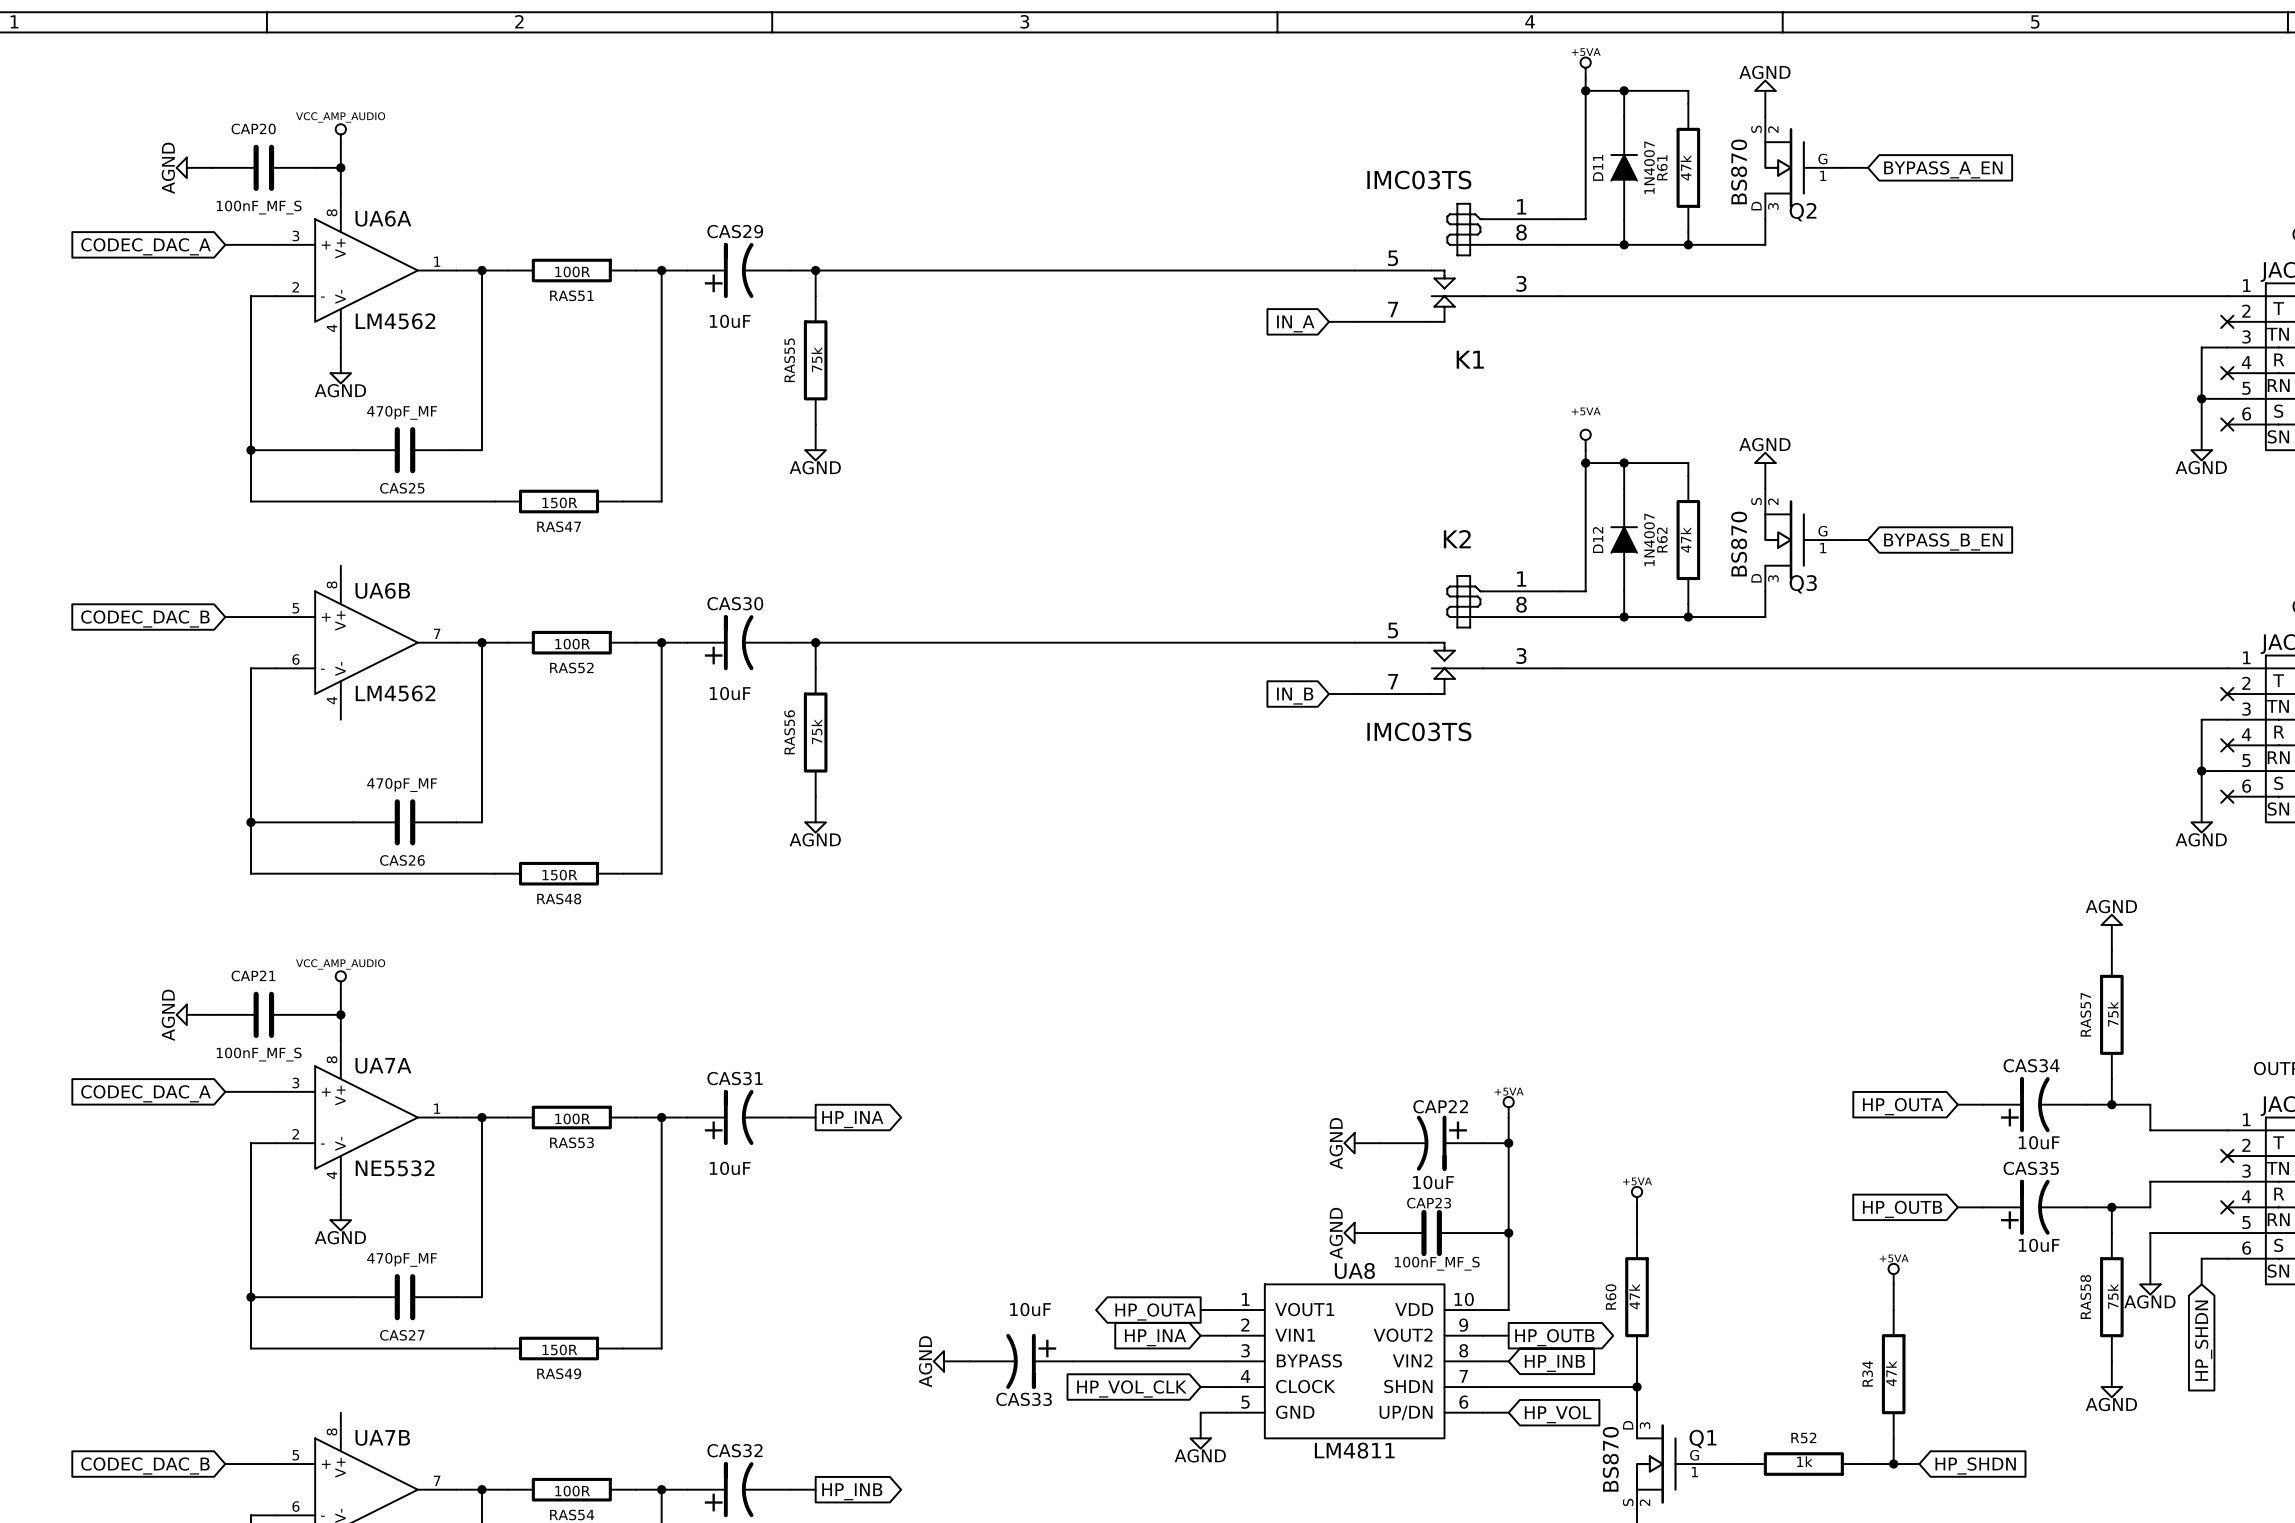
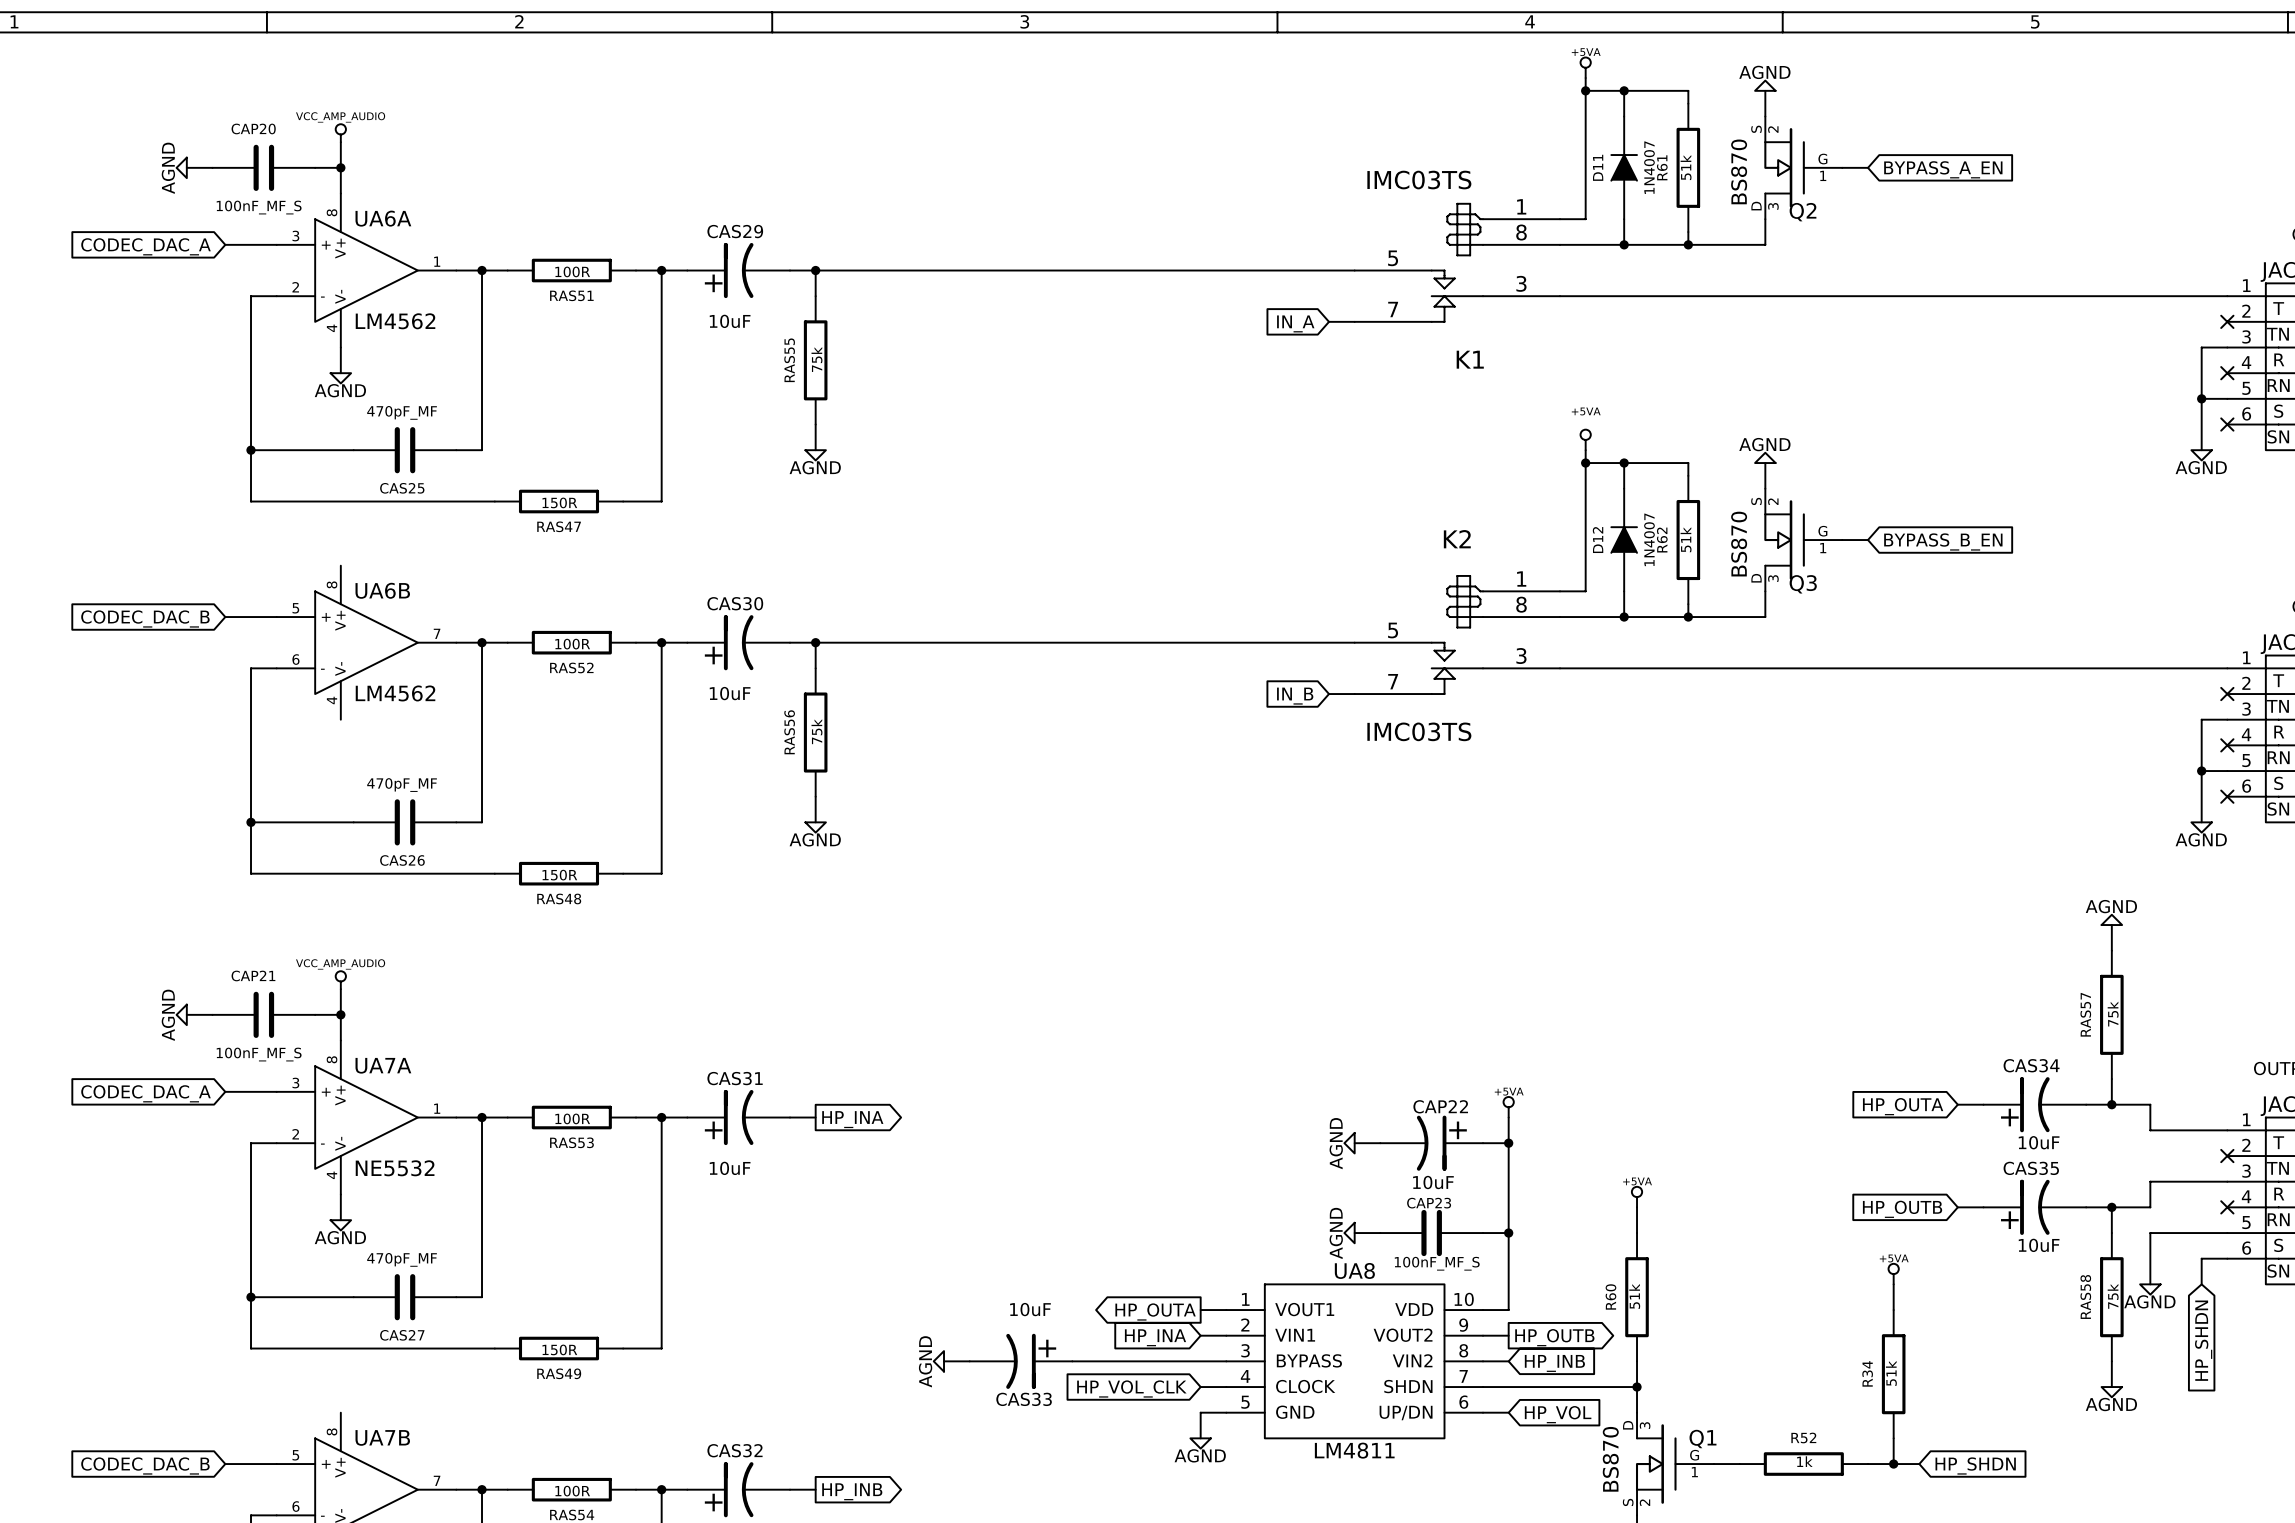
R61 value: 47k (1685, 167) -> 51k (1686, 167)
R62 value: 47k (1685, 539) -> 51k (1686, 539)
R60 value: 47k (1634, 1296) -> 51k (1634, 1296)
R34 value: 47k (1891, 1373) -> 51k (1891, 1373)

